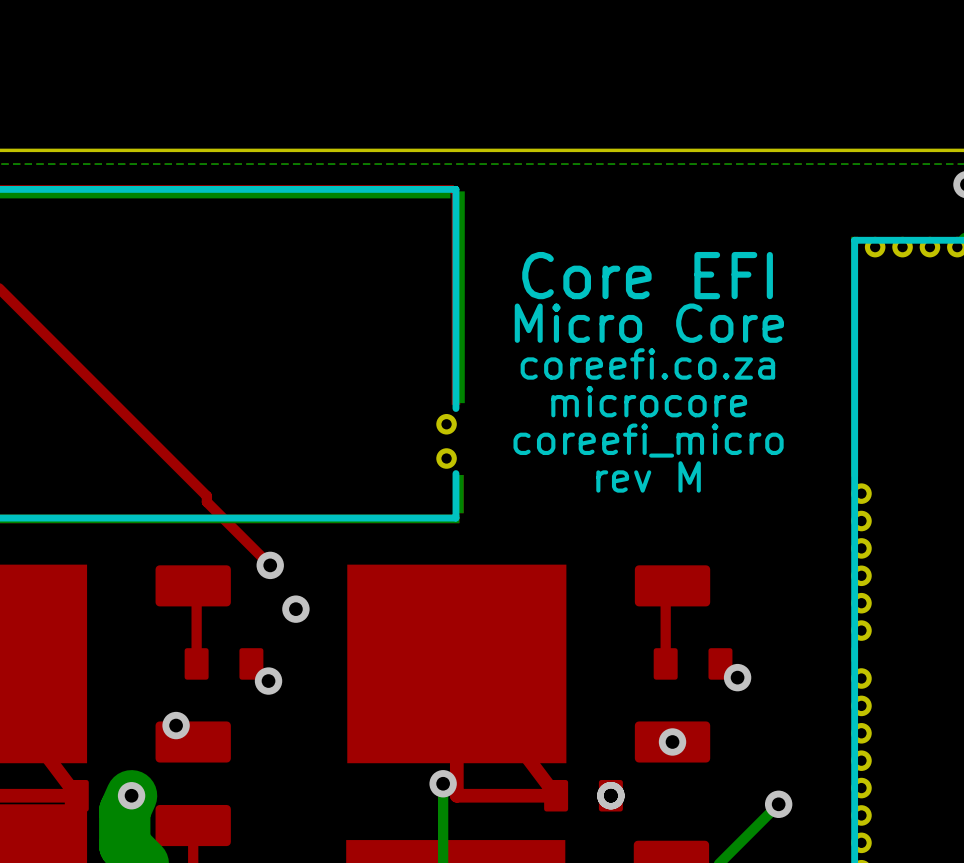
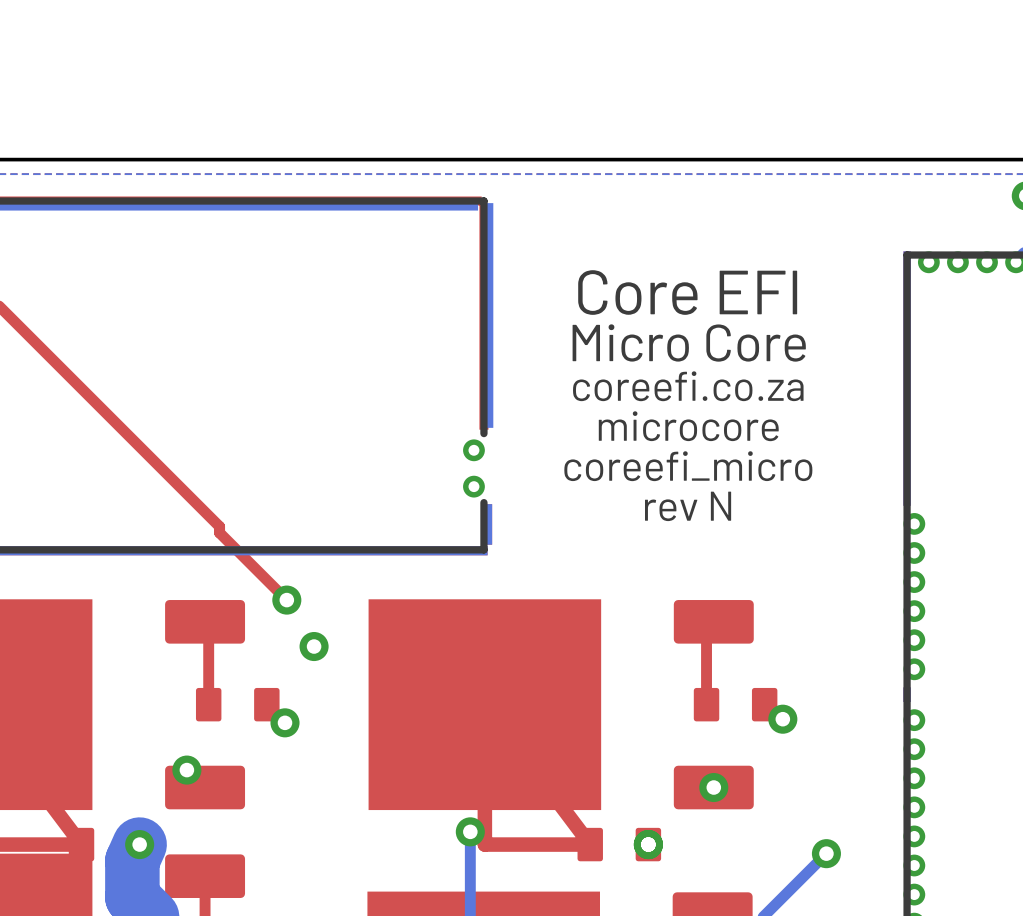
text: rev M (648, 476) -> rev N (688, 506)

